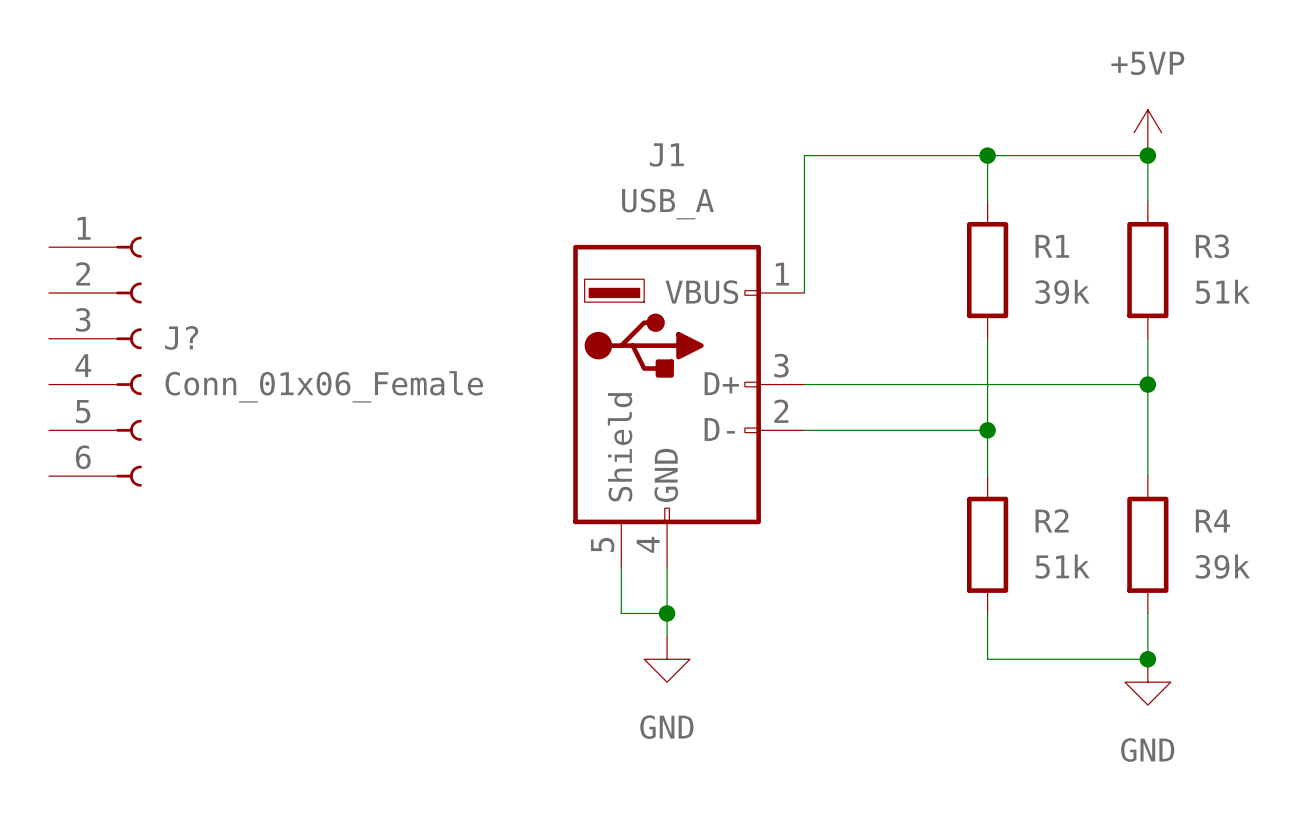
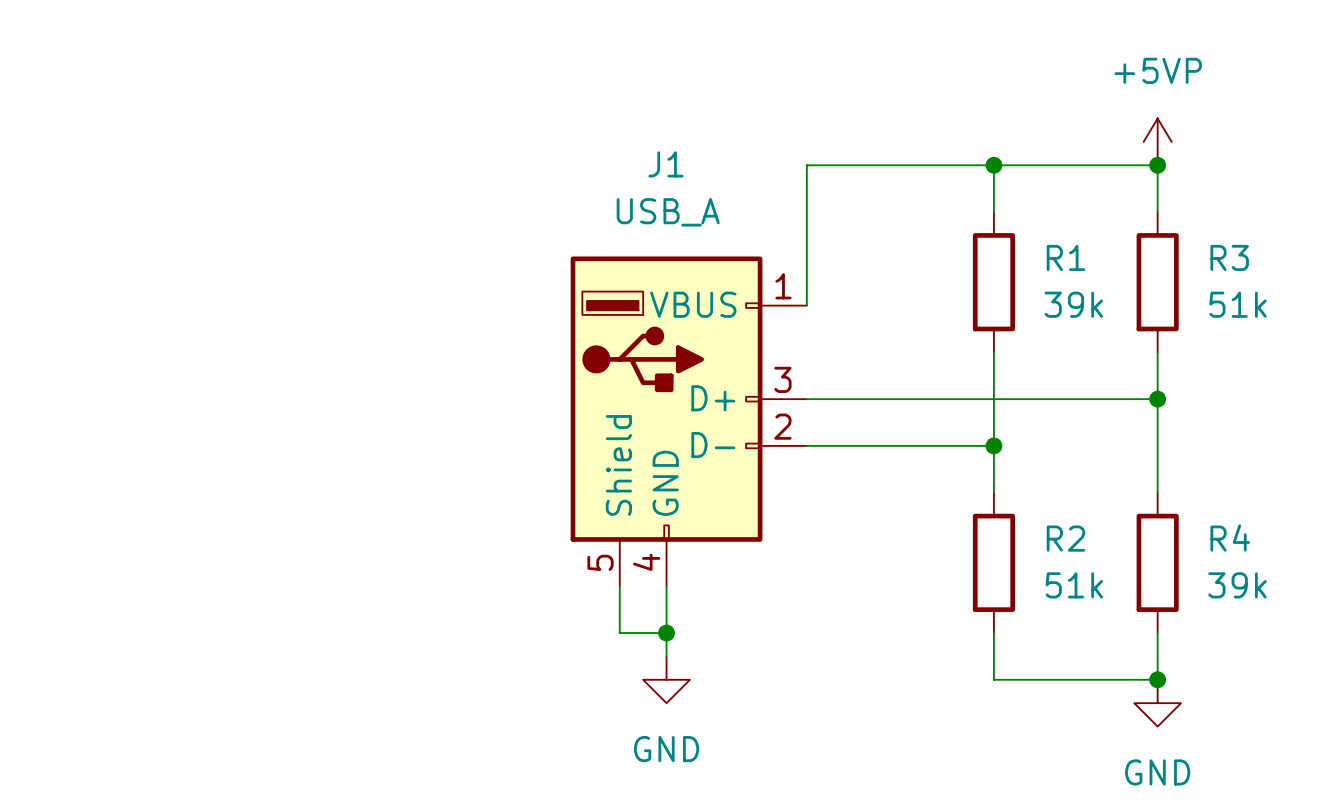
J?: Conn_01x06_Female (95, 361) -> none

